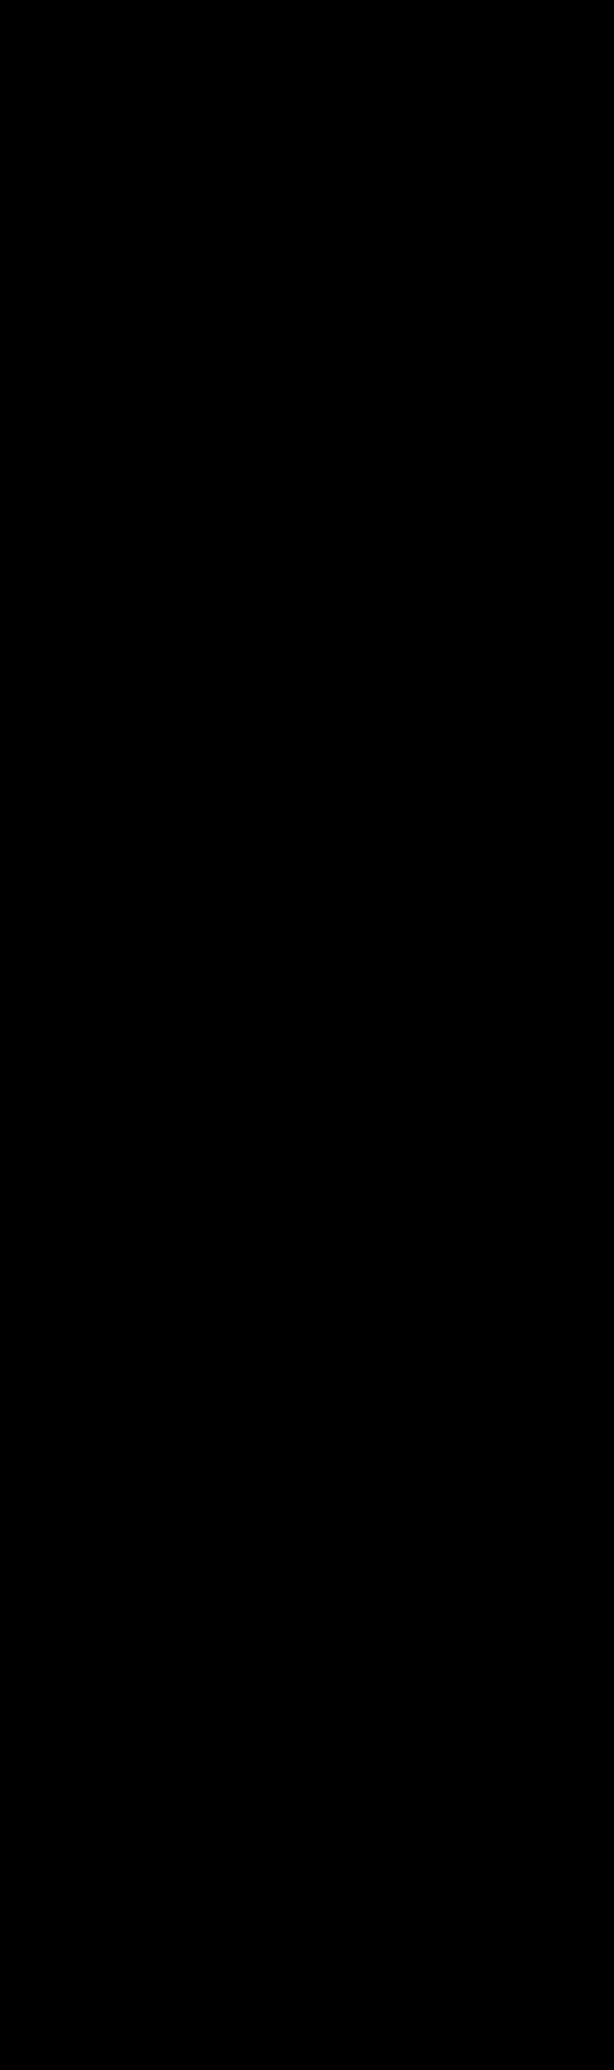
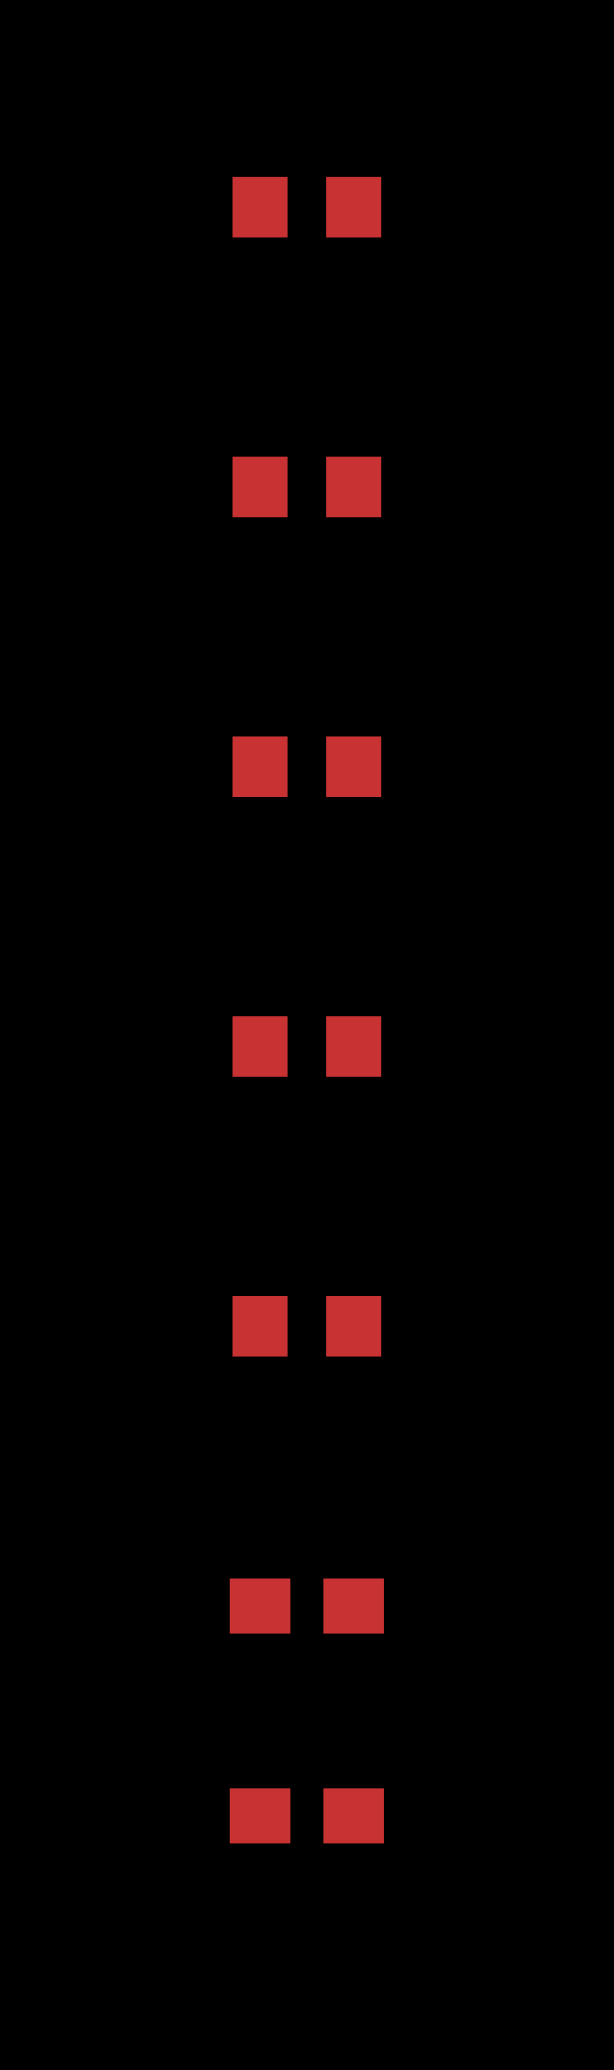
part: none -> (306, 207)
part: none -> (306, 486)
part: none -> (306, 766)
part: none -> (306, 1046)
part: none -> (306, 1326)
part: none -> (306, 1606)
part: none -> (306, 1815)

